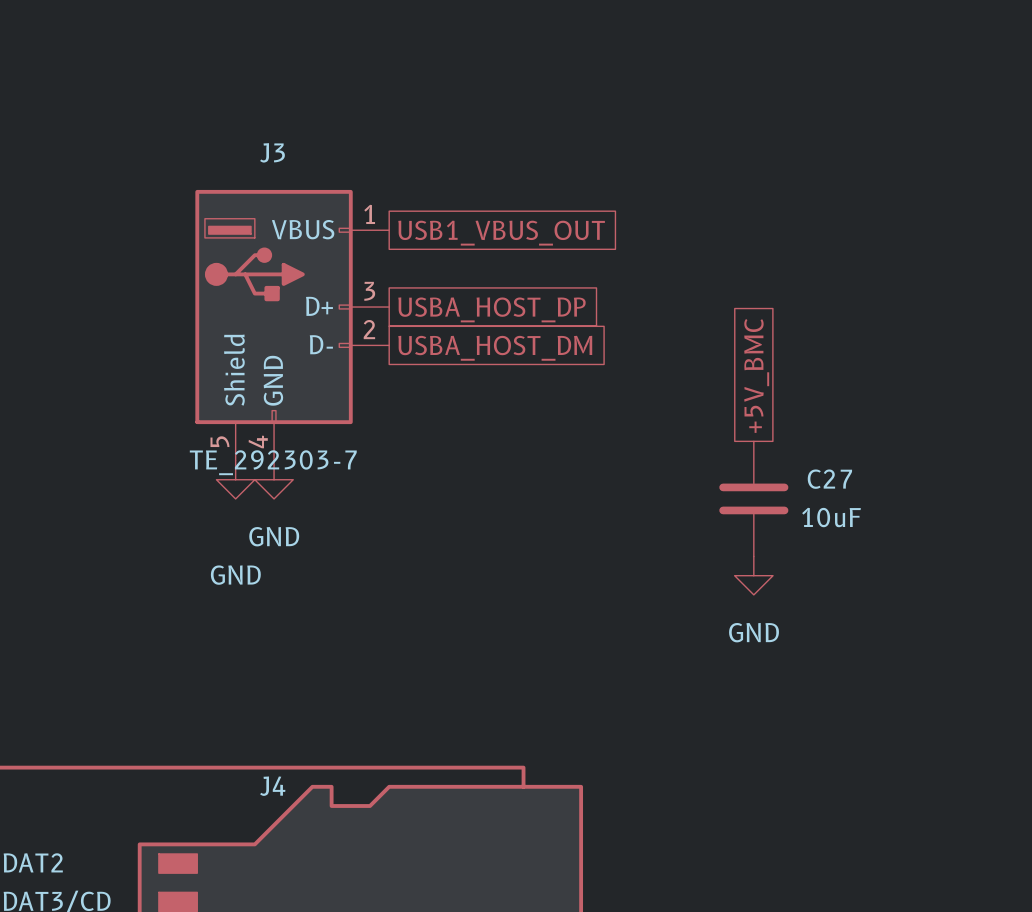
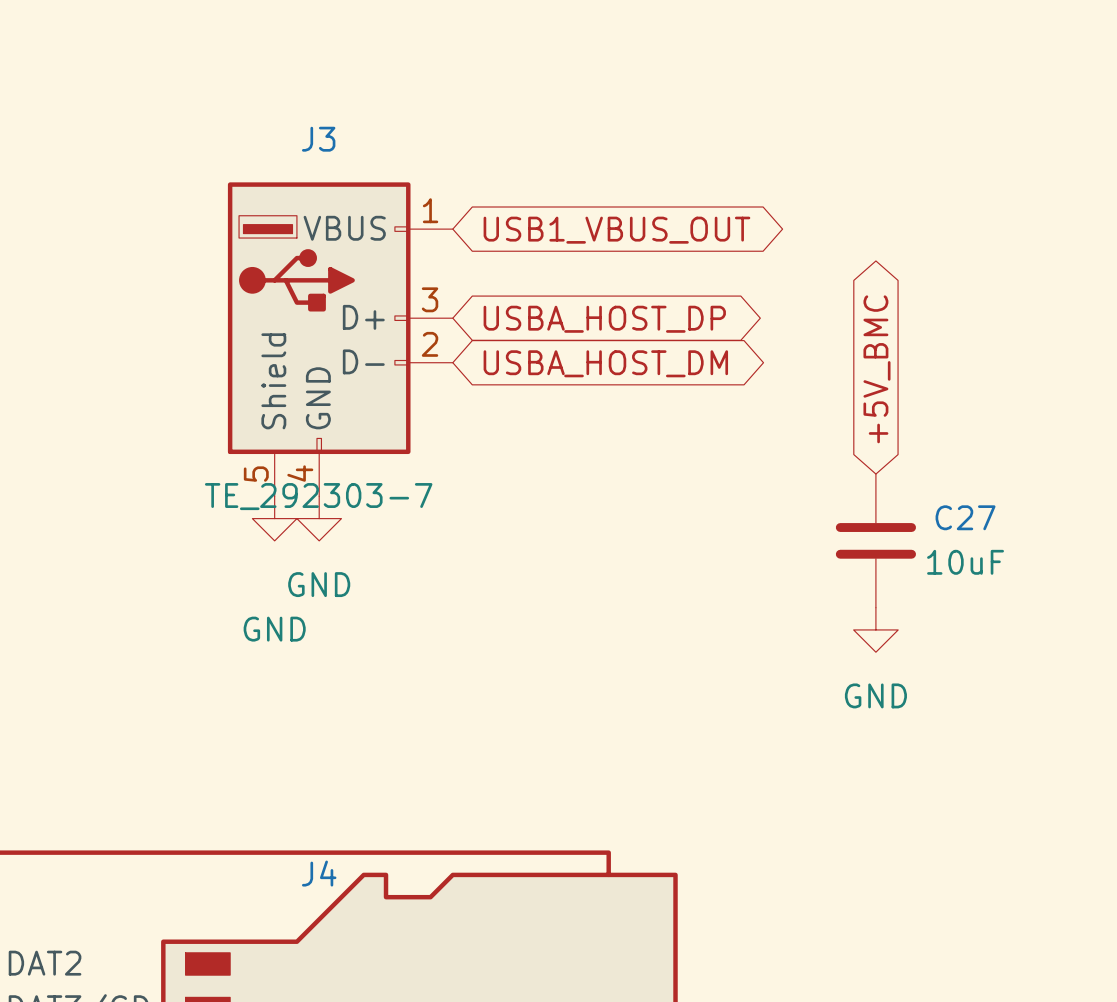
global label shape: passive (501, 233) -> bidirectional (616, 230)
global label shape: passive (491, 309) -> bidirectional (604, 319)
global label shape: passive (495, 348) -> bidirectional (605, 363)
global label shape: passive (756, 375) -> bidirectional (876, 369)

